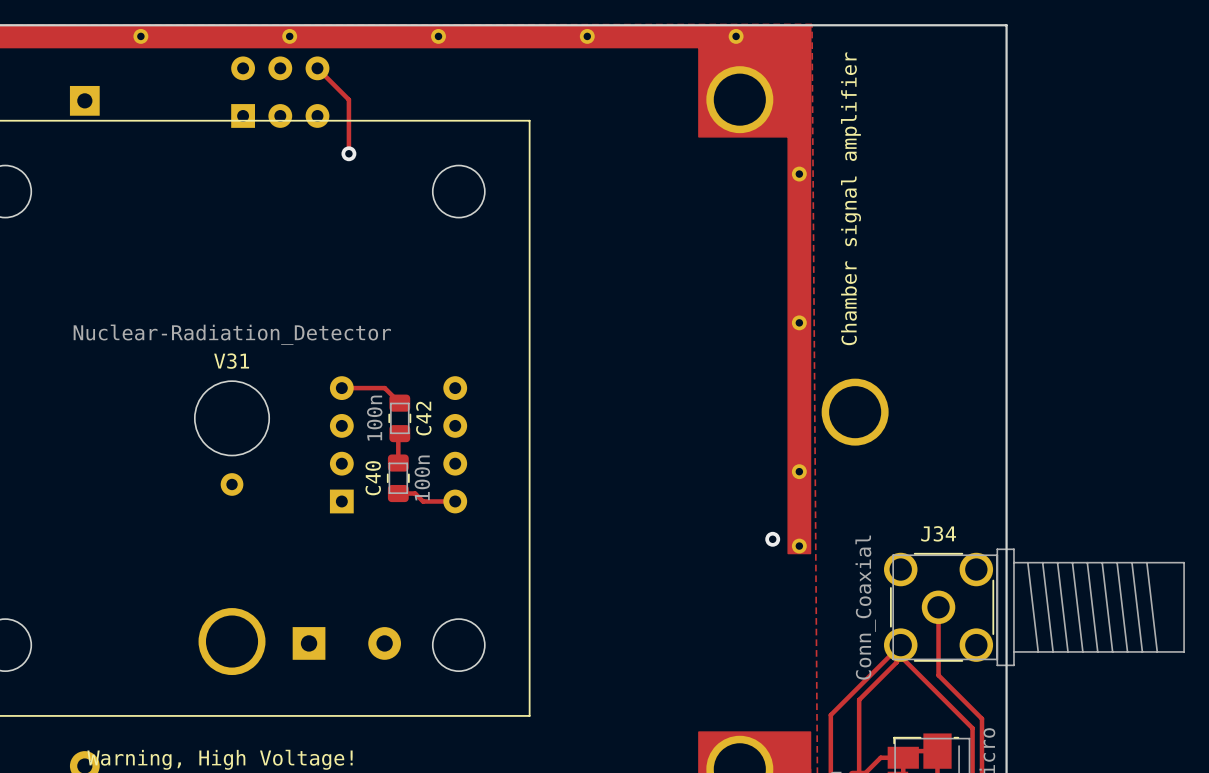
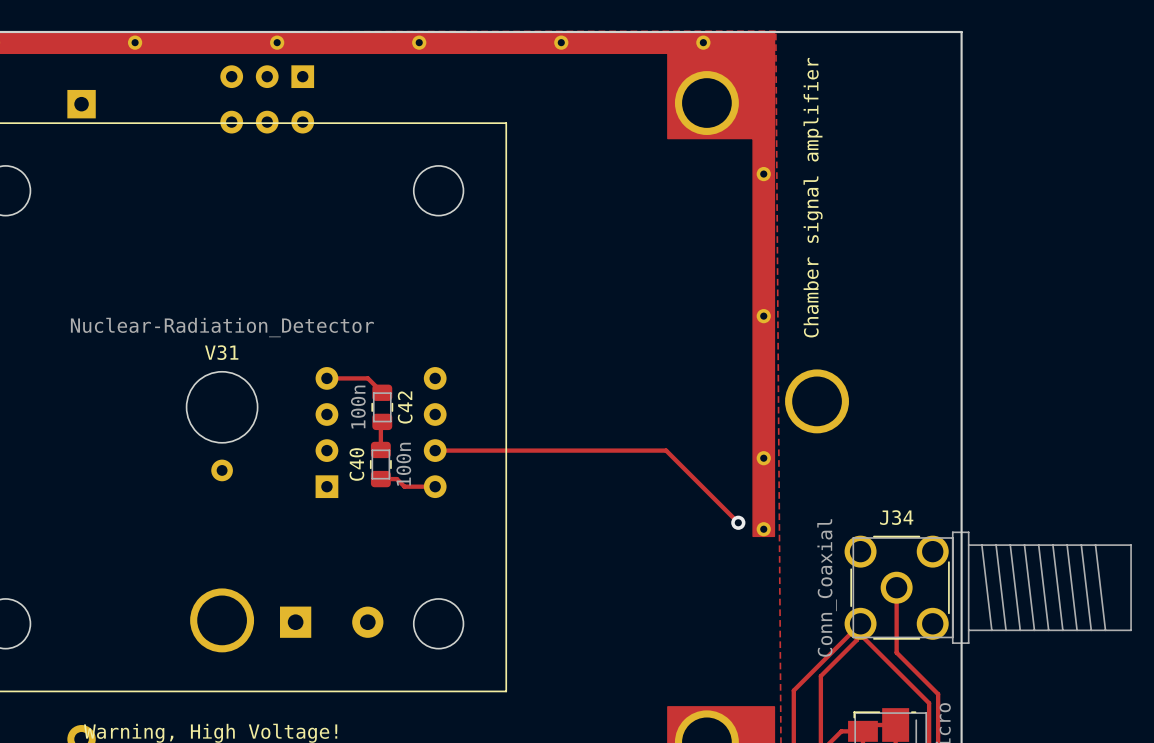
track: (317, 68) (348, 99) (348, 153) -> none
part rotation: 0° (280, 92) -> 180° (267, 99)
via: (348, 153) -> none
track: none -> (435, 450) (666, 450) (738, 522)

